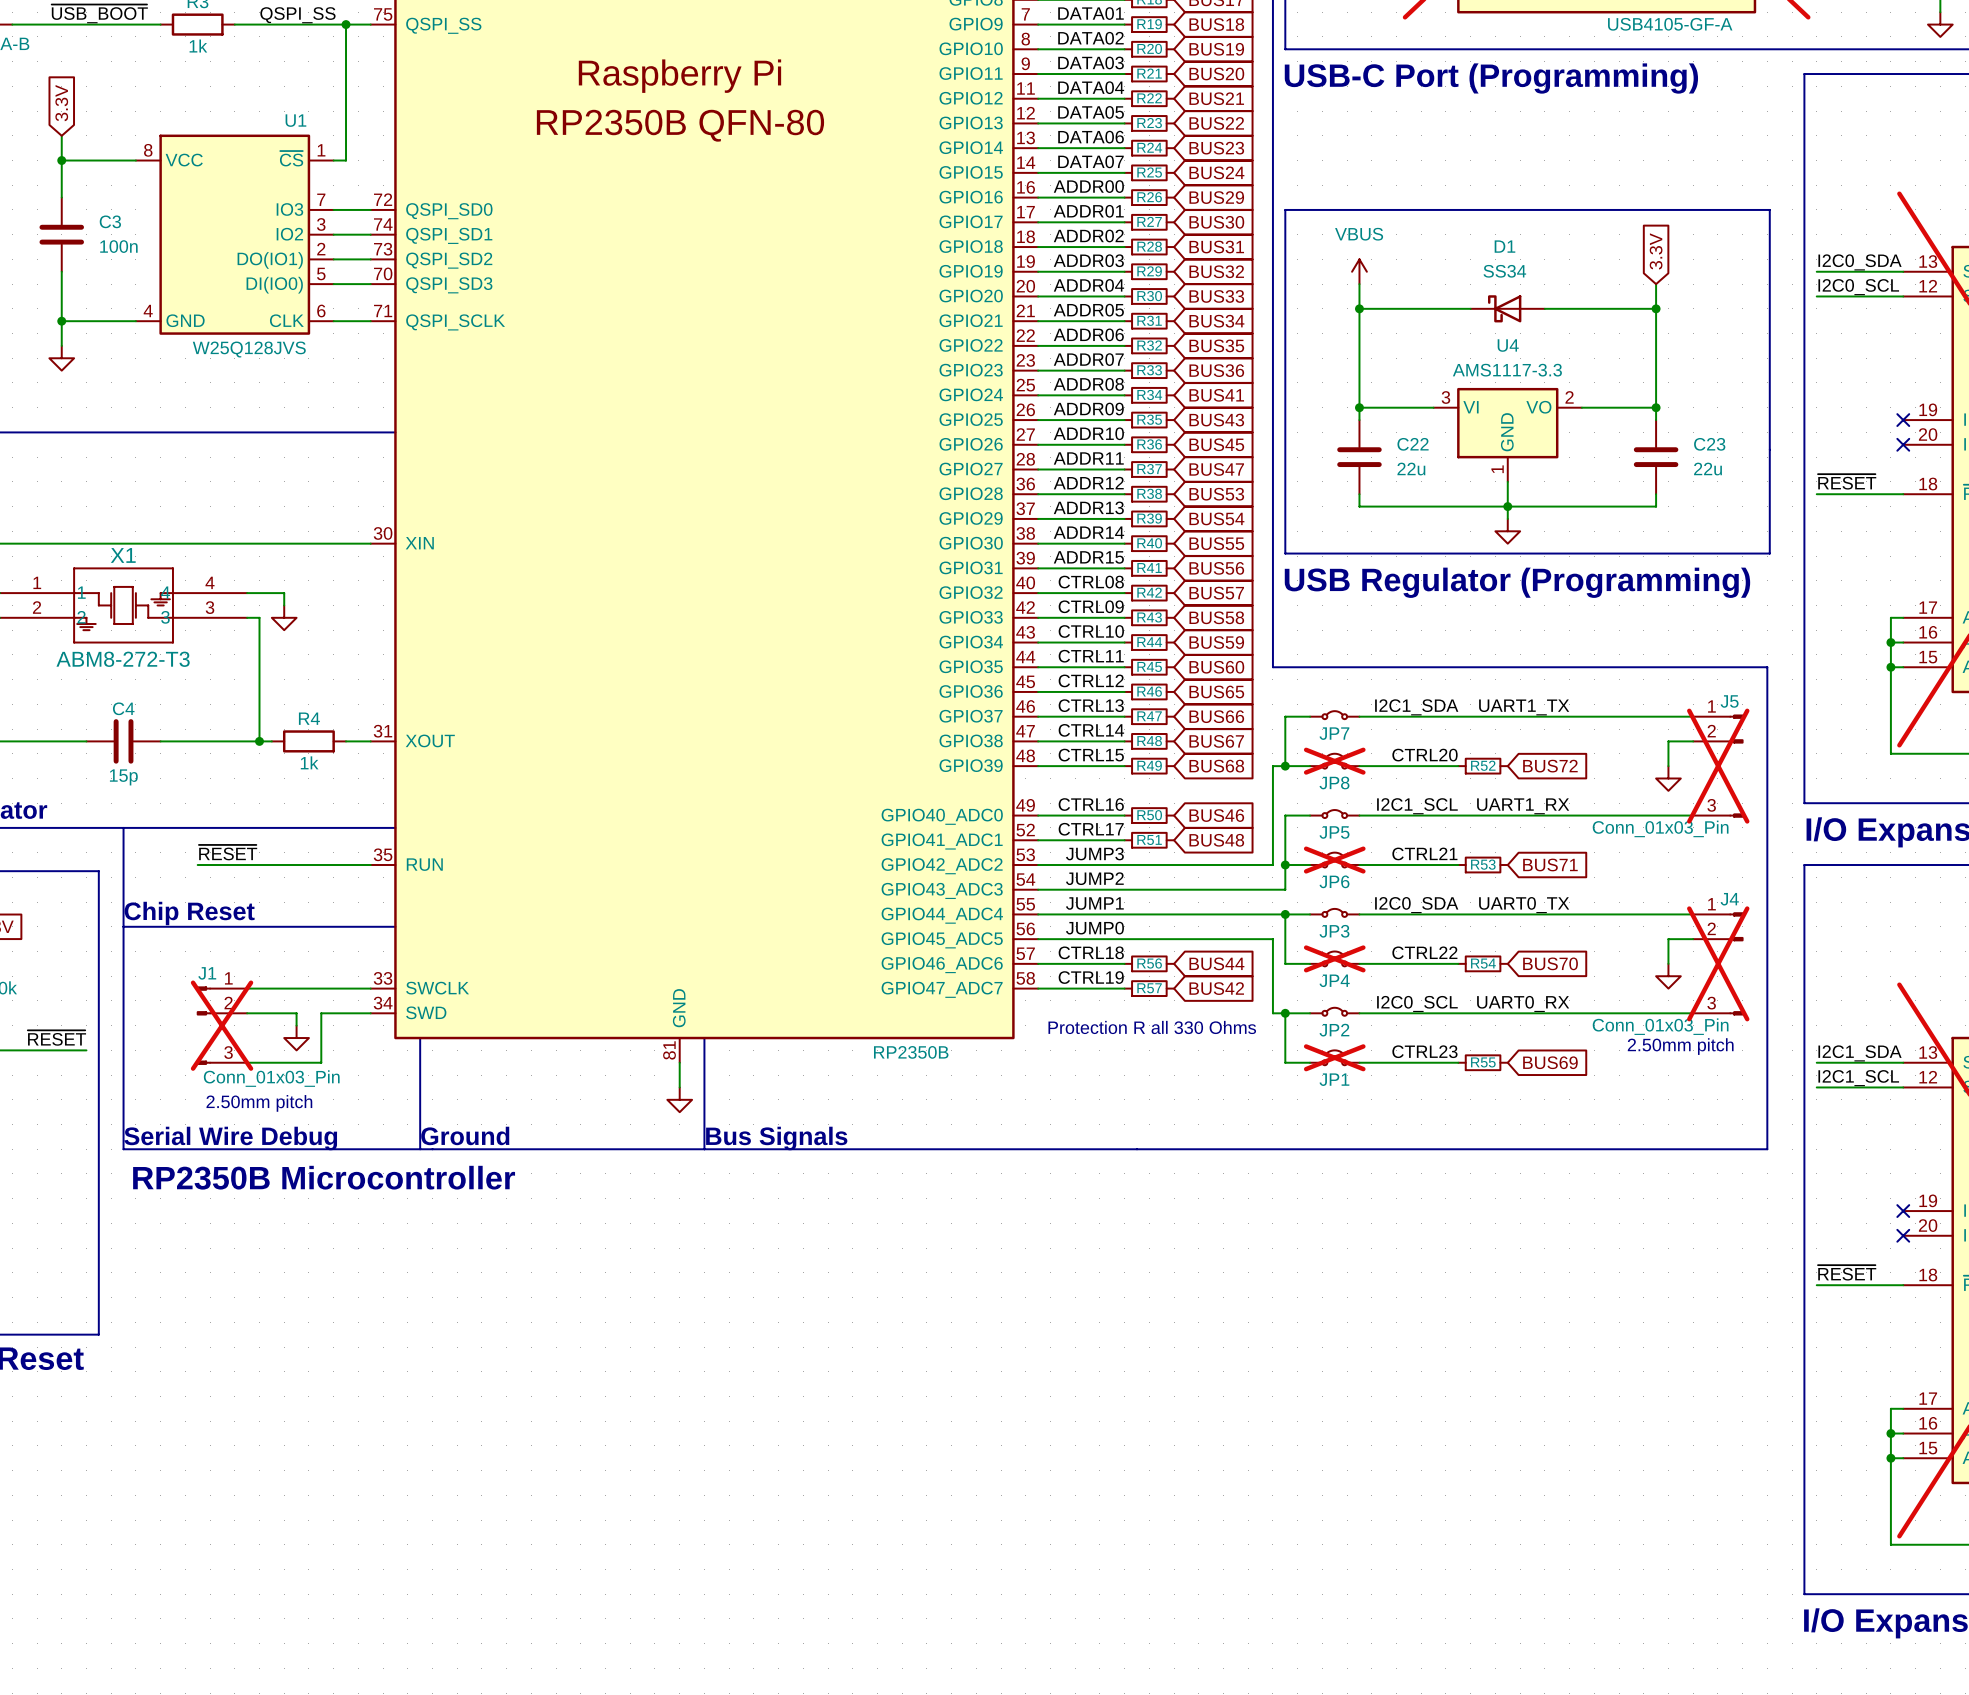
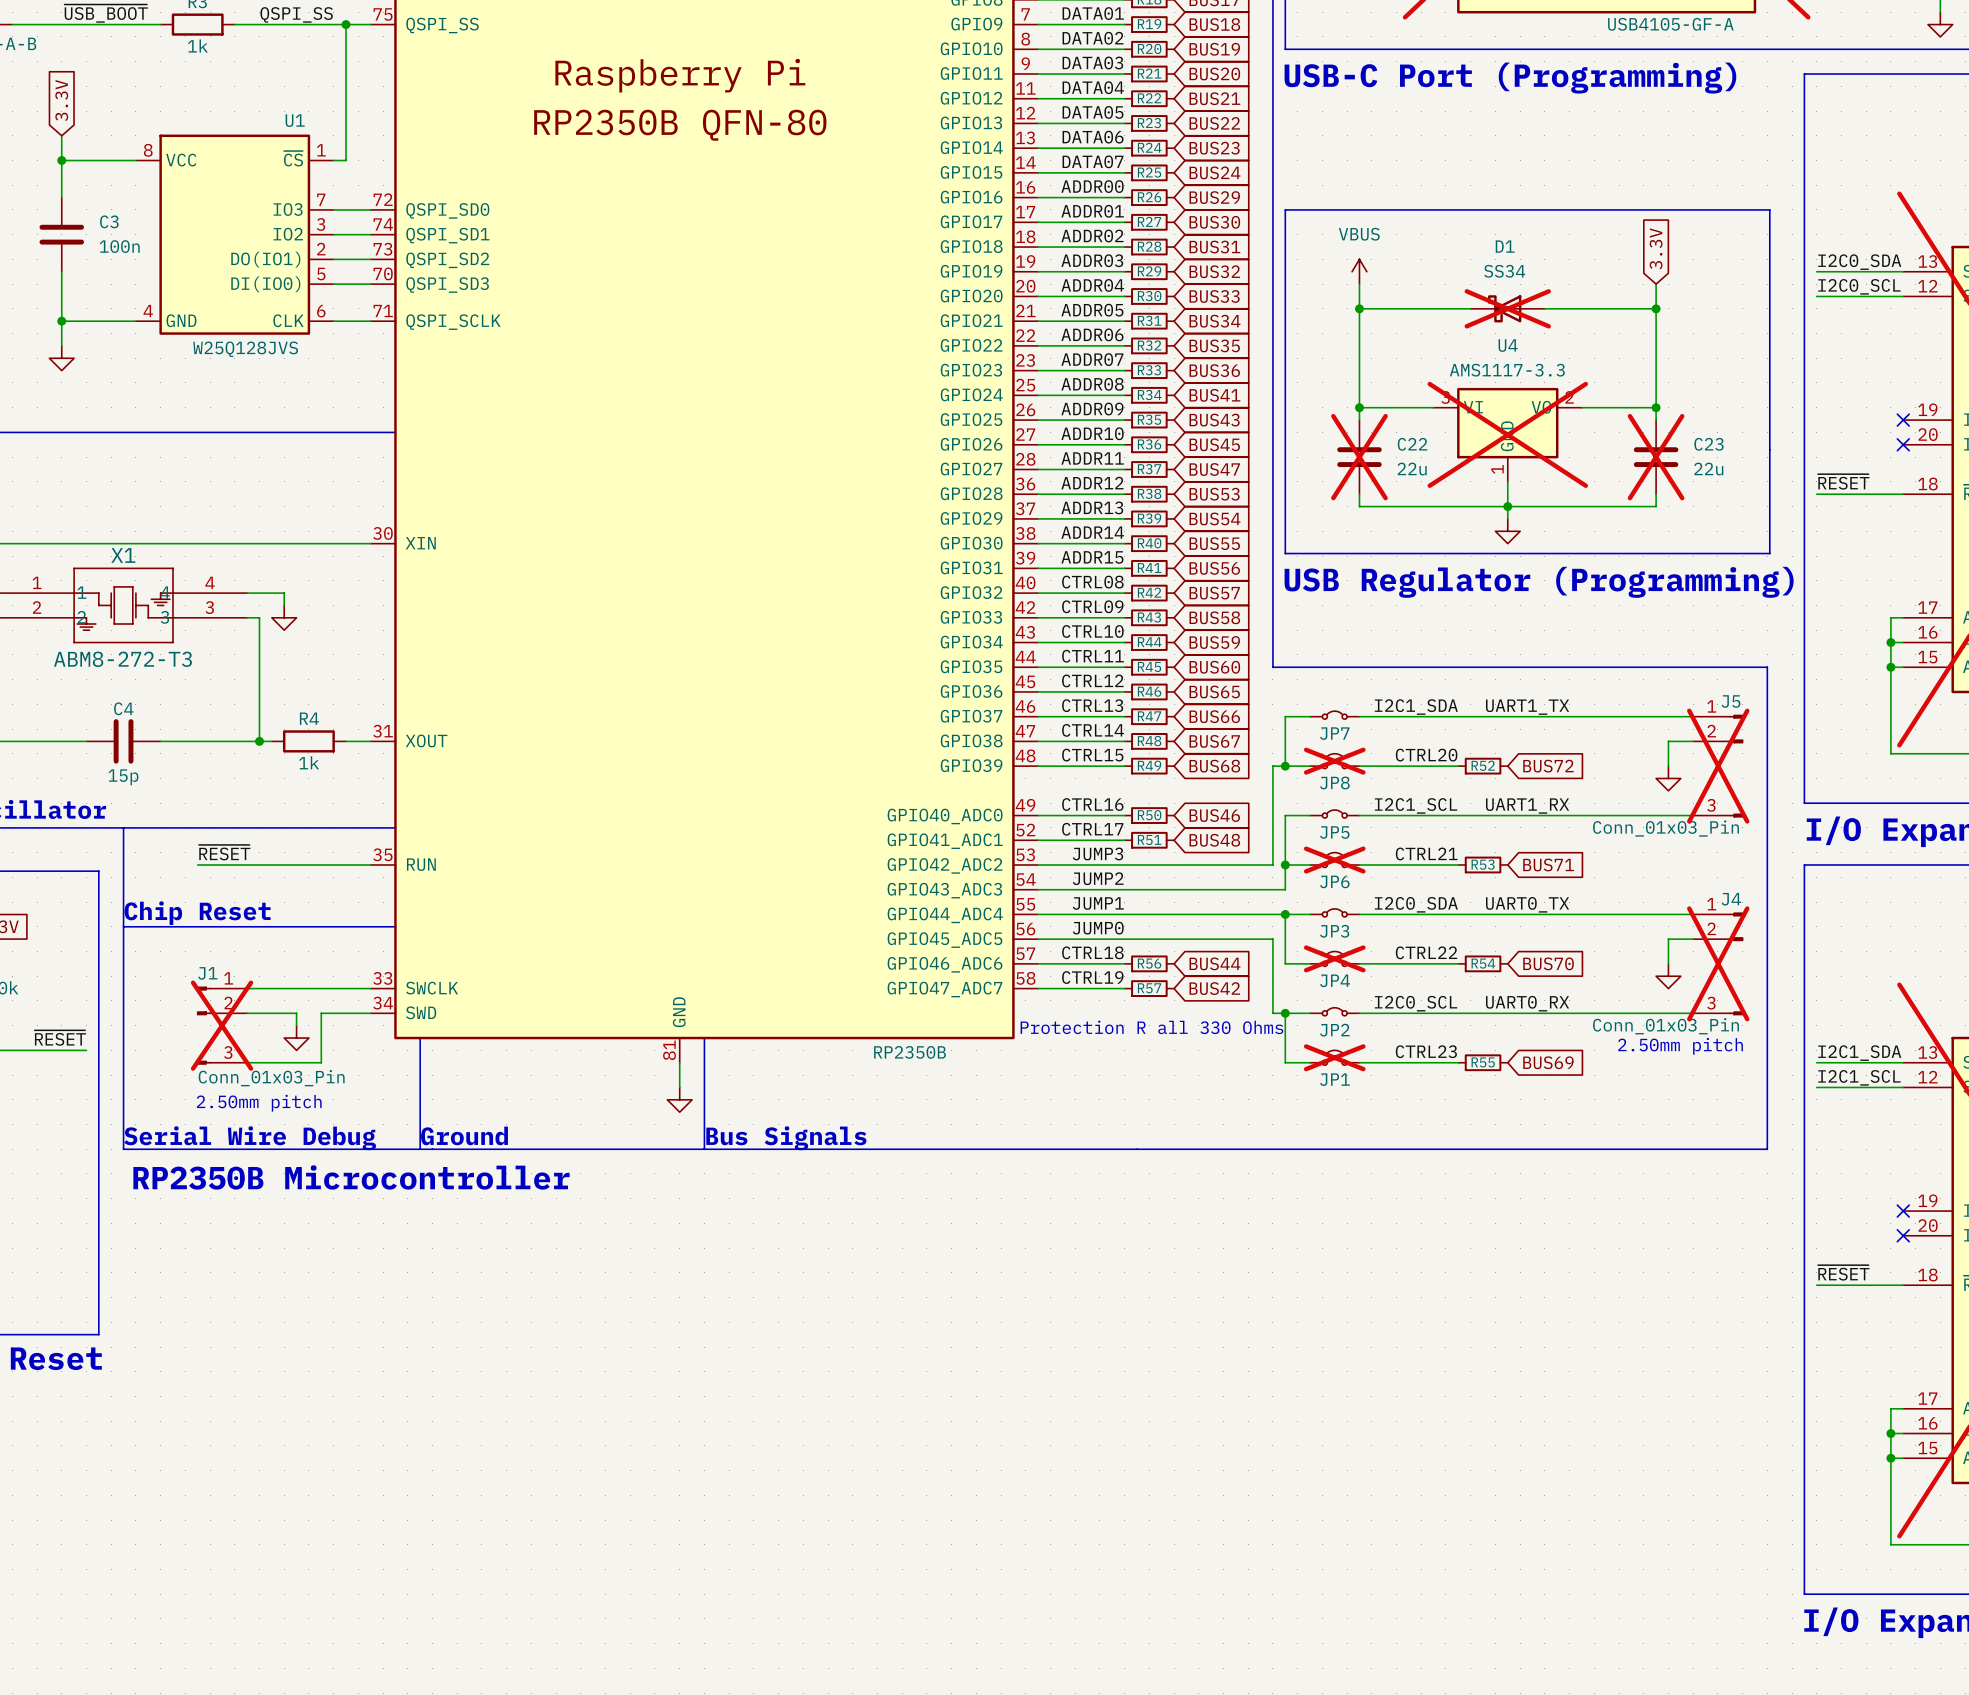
D1 do-not-place cross: none -> (1507, 308)
U4 do-not-place cross: none -> (1507, 434)
C22 do-not-place cross: none -> (1359, 457)
C23 do-not-place cross: none -> (1656, 457)

